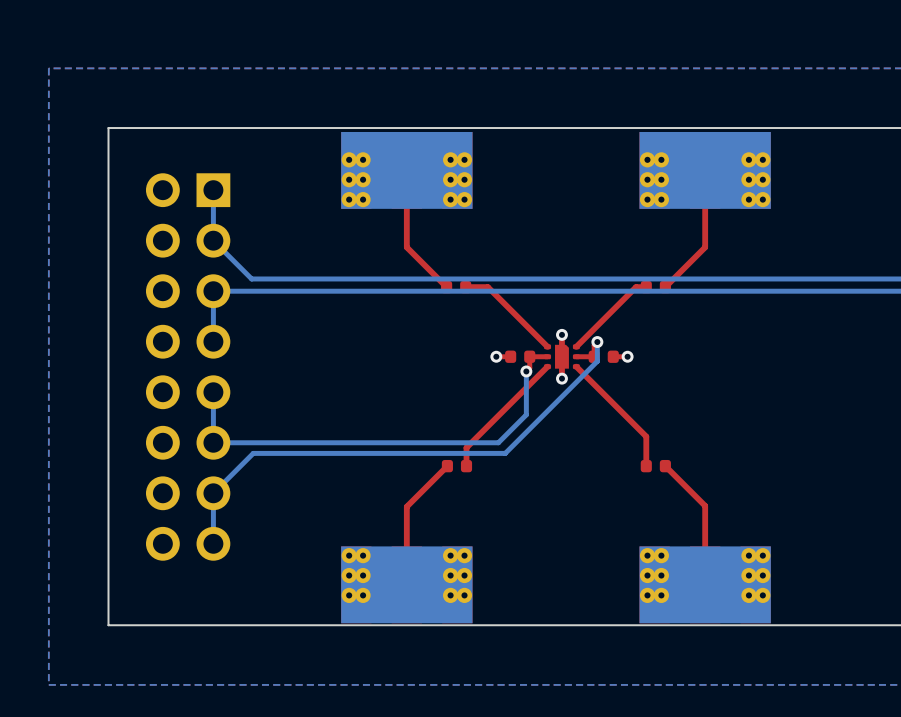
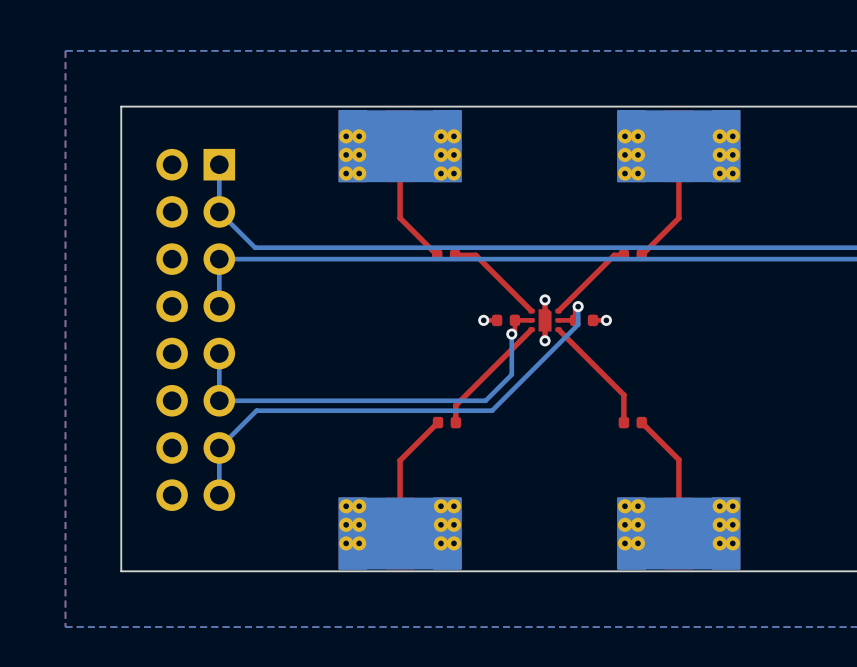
part footprint: [341, 131, 473, 209] -> [338, 110, 462, 183]
part footprint: [639, 131, 771, 209] -> [617, 110, 741, 183]
part footprint: [341, 546, 473, 624] -> [338, 497, 462, 570]
part footprint: [639, 546, 771, 624] -> [617, 497, 741, 570]

